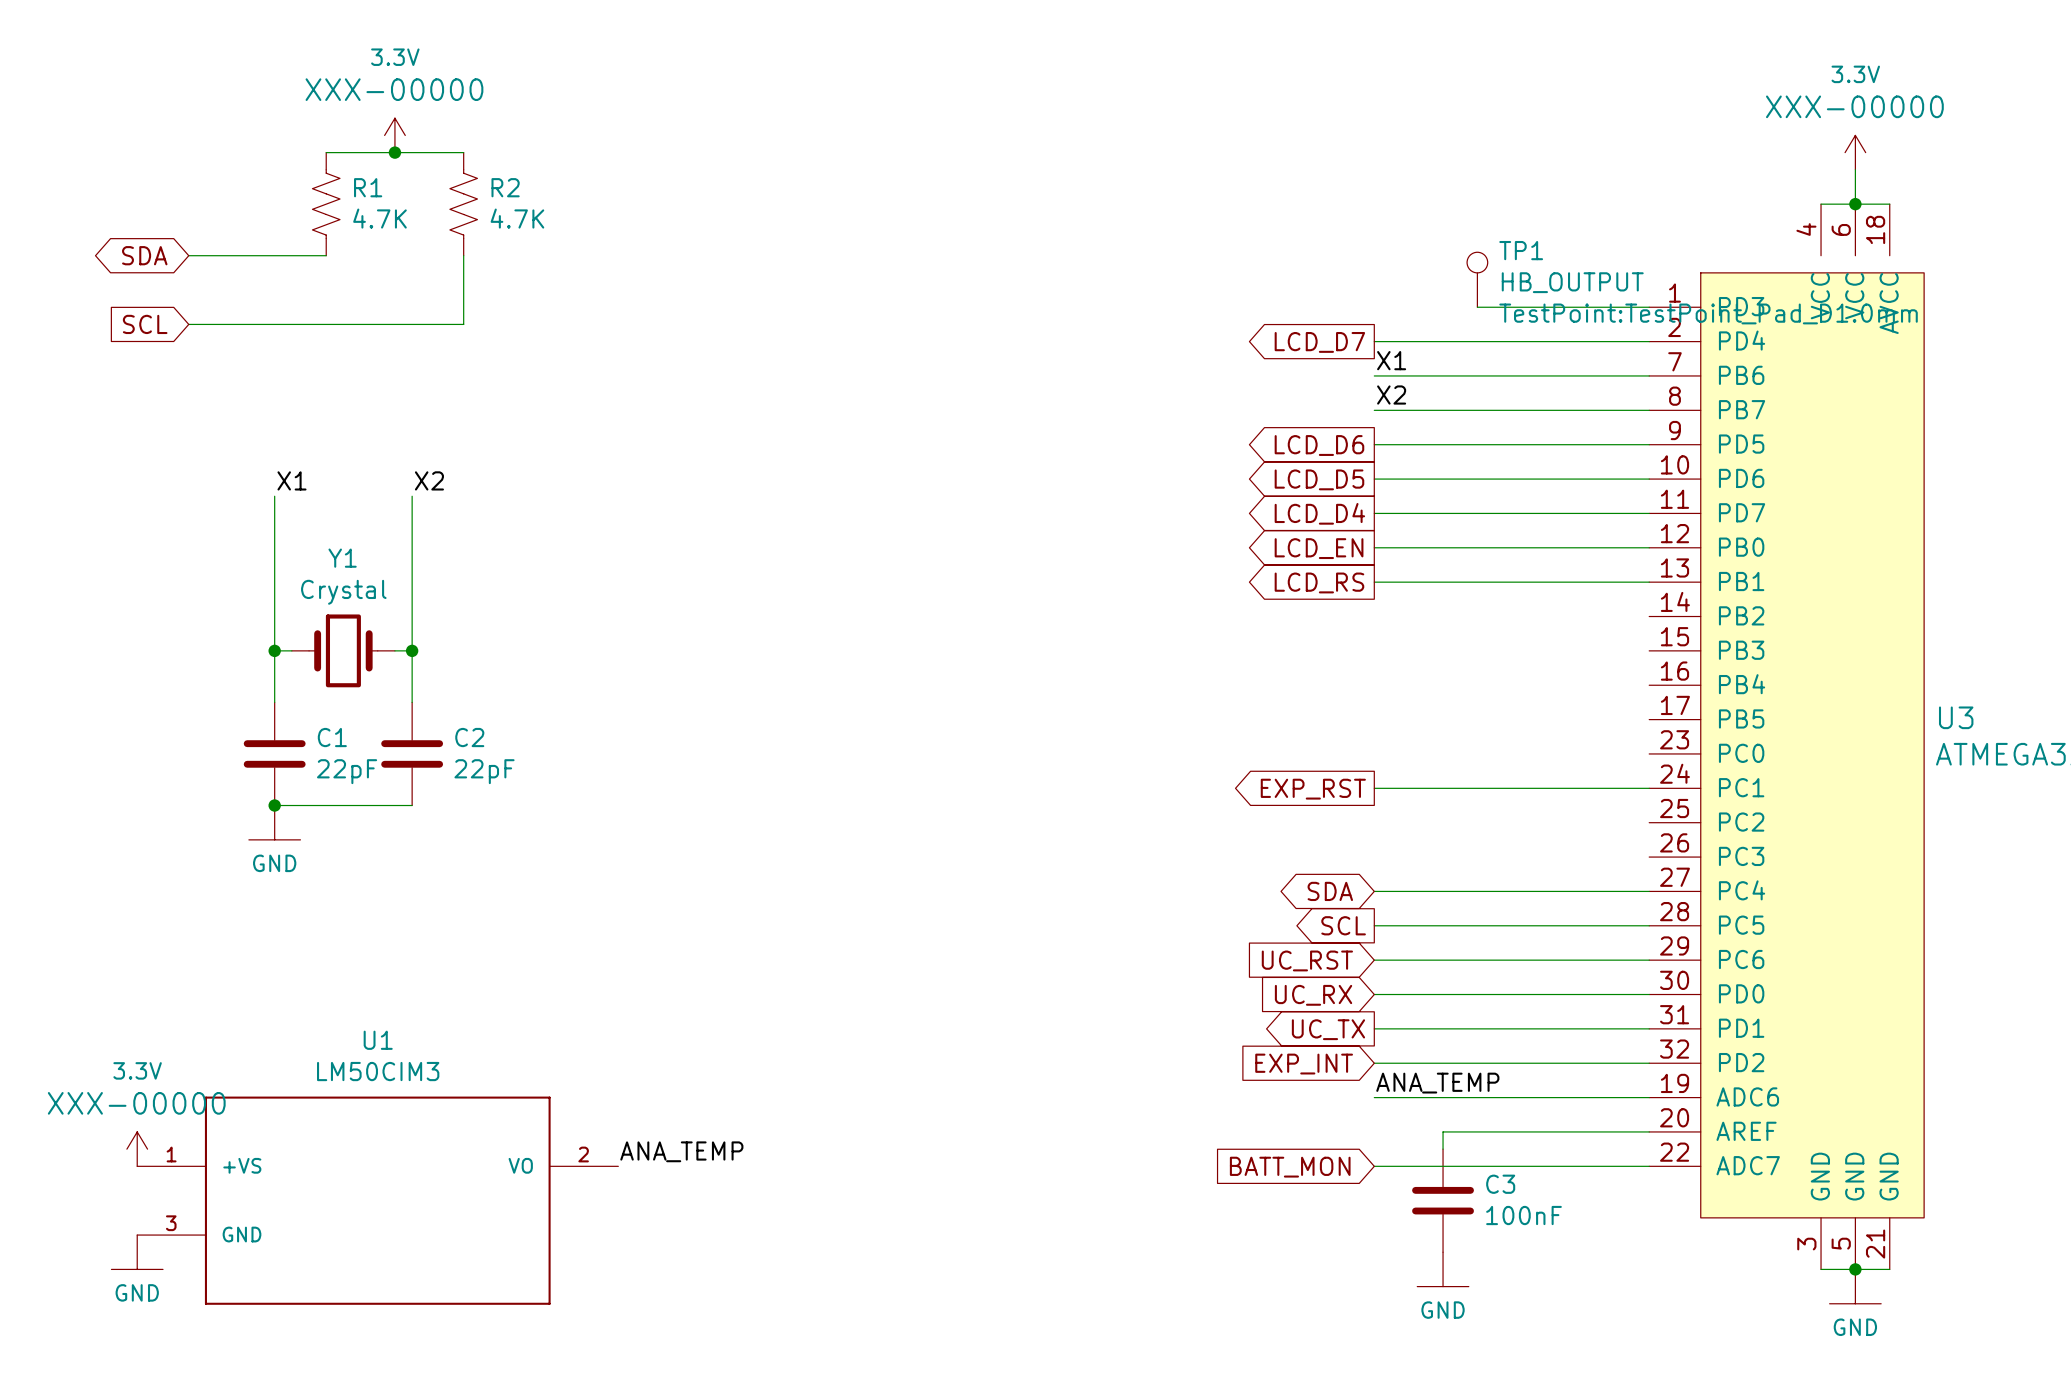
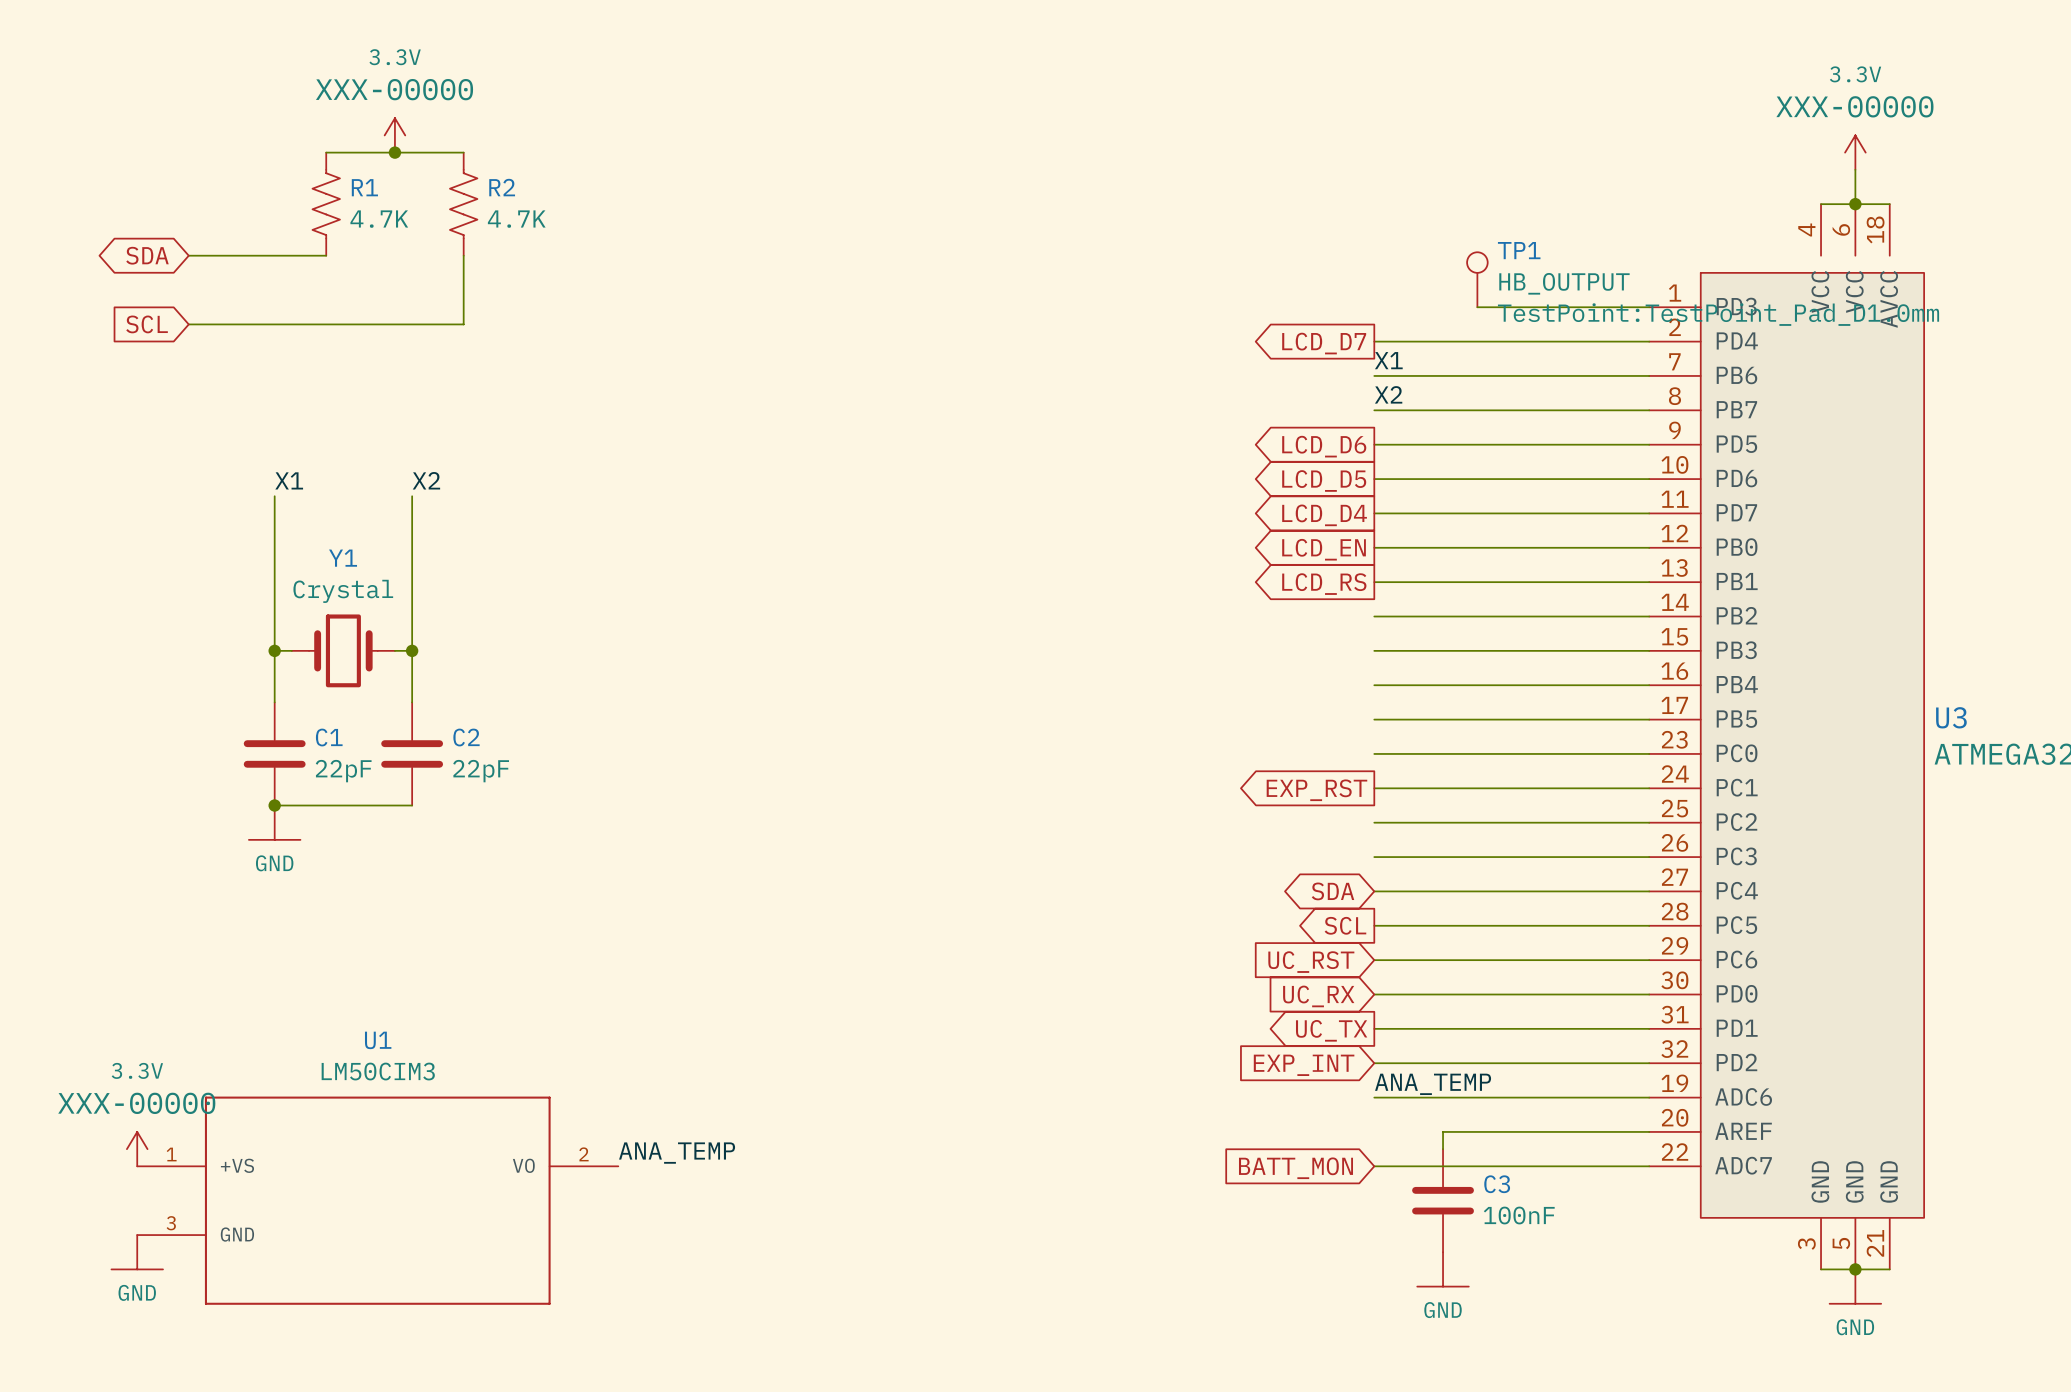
wire: none -> (1374, 616) (1649, 616)
wire: none -> (1374, 650) (1649, 650)
wire: none -> (1374, 685) (1649, 685)
wire: none -> (1374, 719) (1649, 719)
wire: none -> (1374, 753) (1649, 753)
wire: none -> (1374, 822) (1649, 822)
wire: none -> (1374, 857) (1649, 857)

